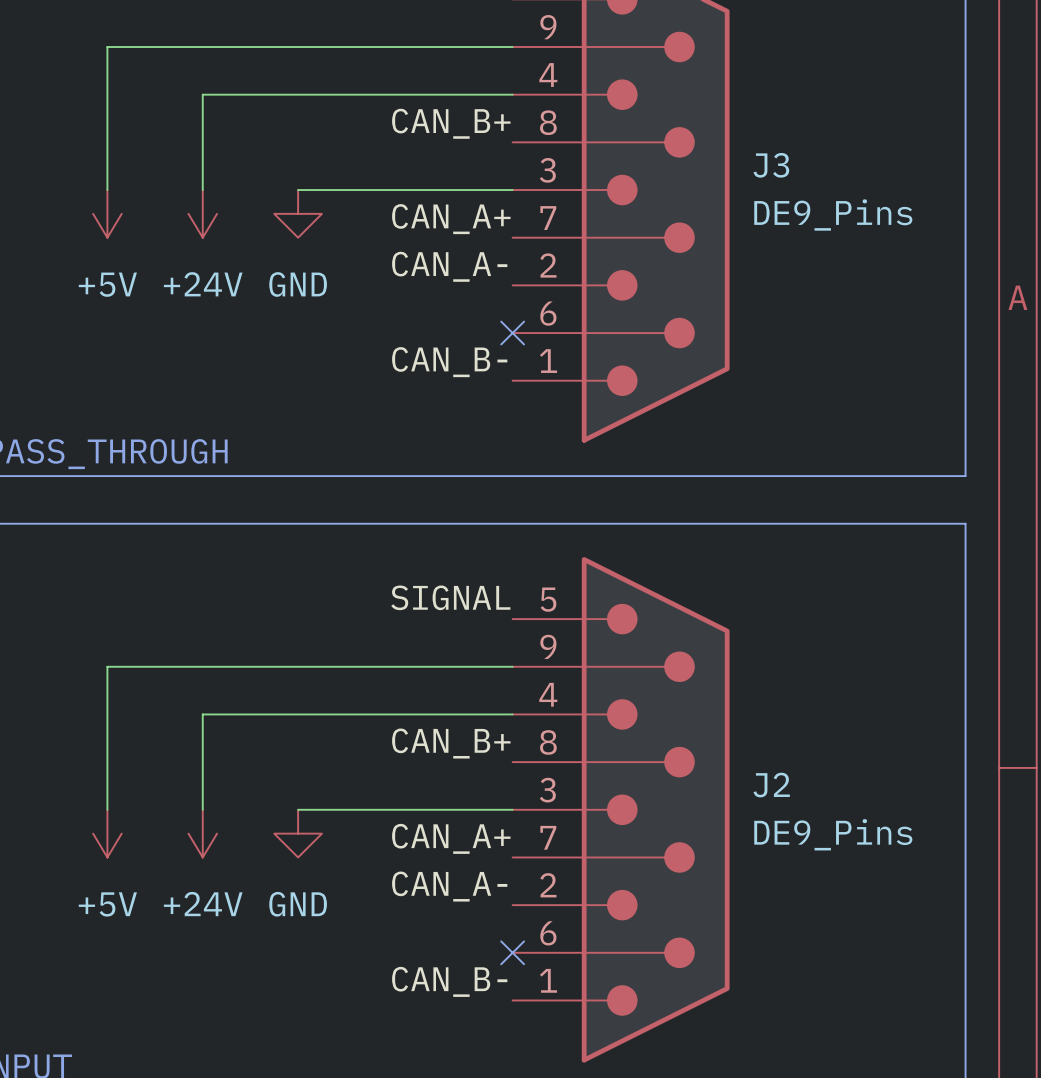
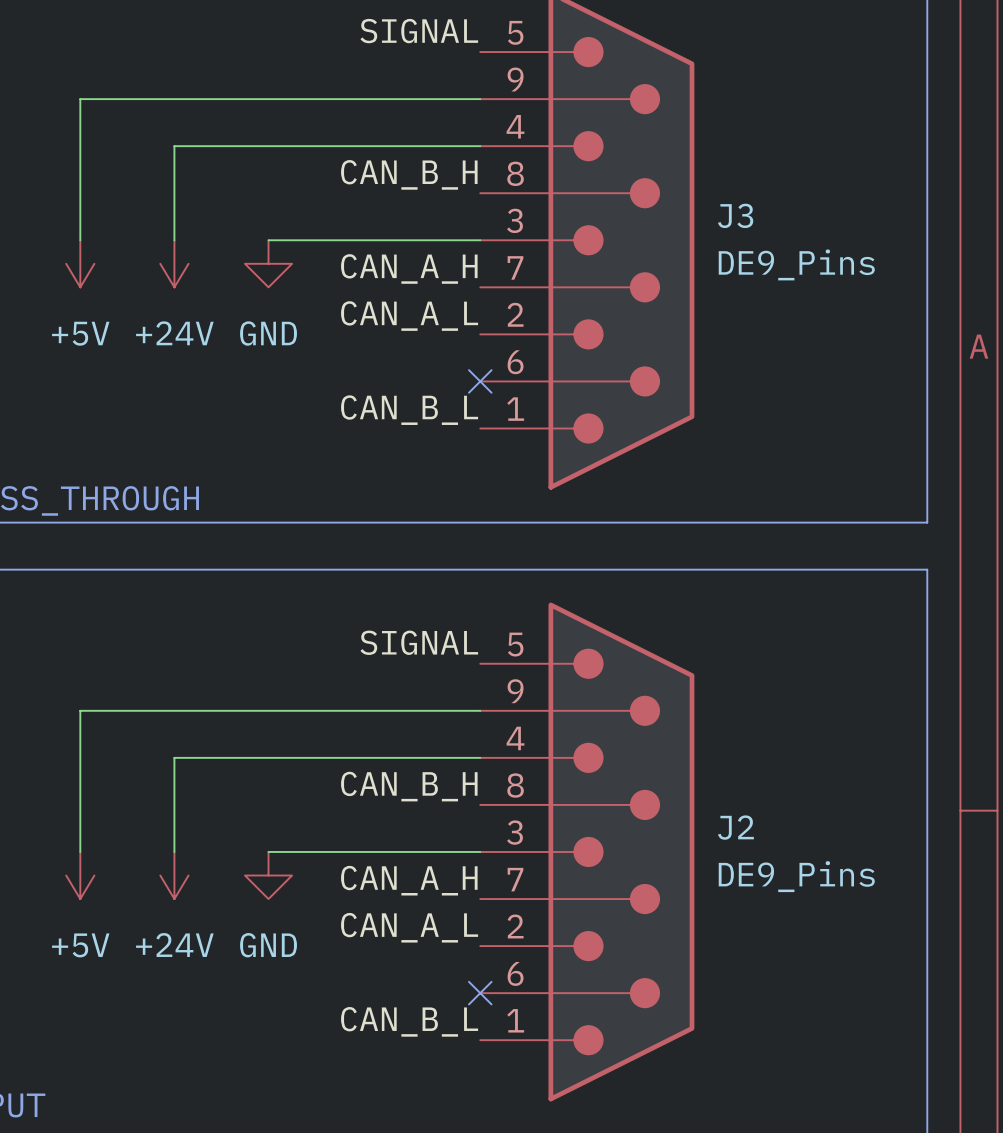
label: CAN_B+ (451, 123) -> CAN_B_H (409, 174)
label: CAN_A+ (451, 219) -> CAN_A_H (409, 268)
label: CAN_A- (449, 266) -> CAN_A_L (409, 316)
label: CAN_B- (449, 362) -> CAN_B_L (409, 410)
label: CAN_B+ (451, 743) -> CAN_B_H (409, 786)
label: CAN_A+ (451, 838) -> CAN_A_H (409, 880)
label: CAN_A- (449, 886) -> CAN_A_L (409, 927)
label: CAN_B- (449, 981) -> CAN_B_L (409, 1021)

